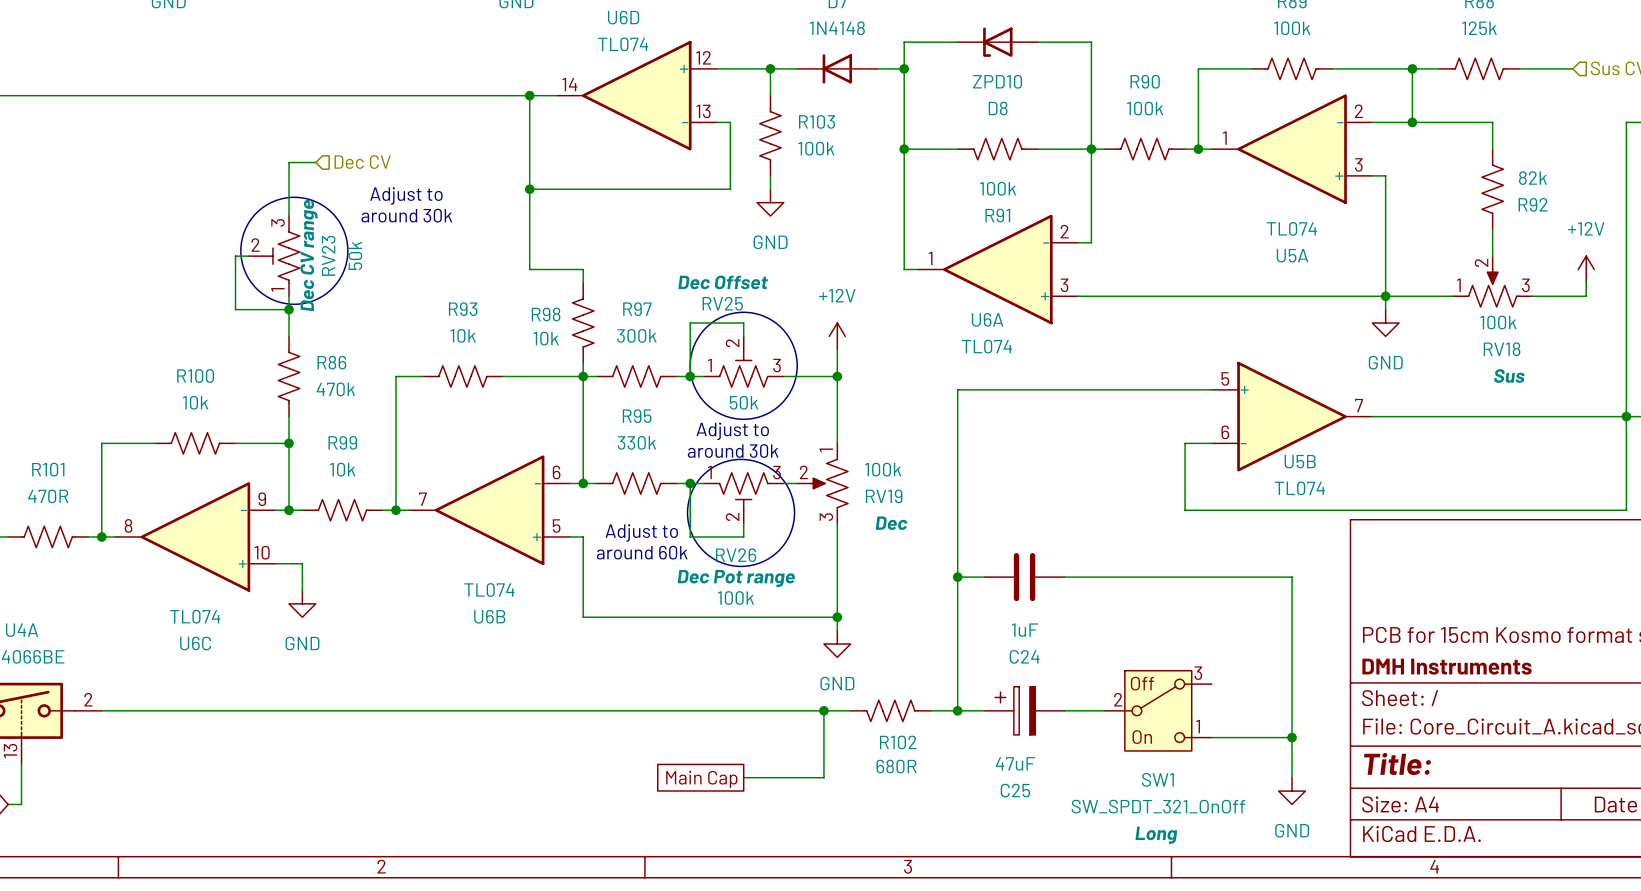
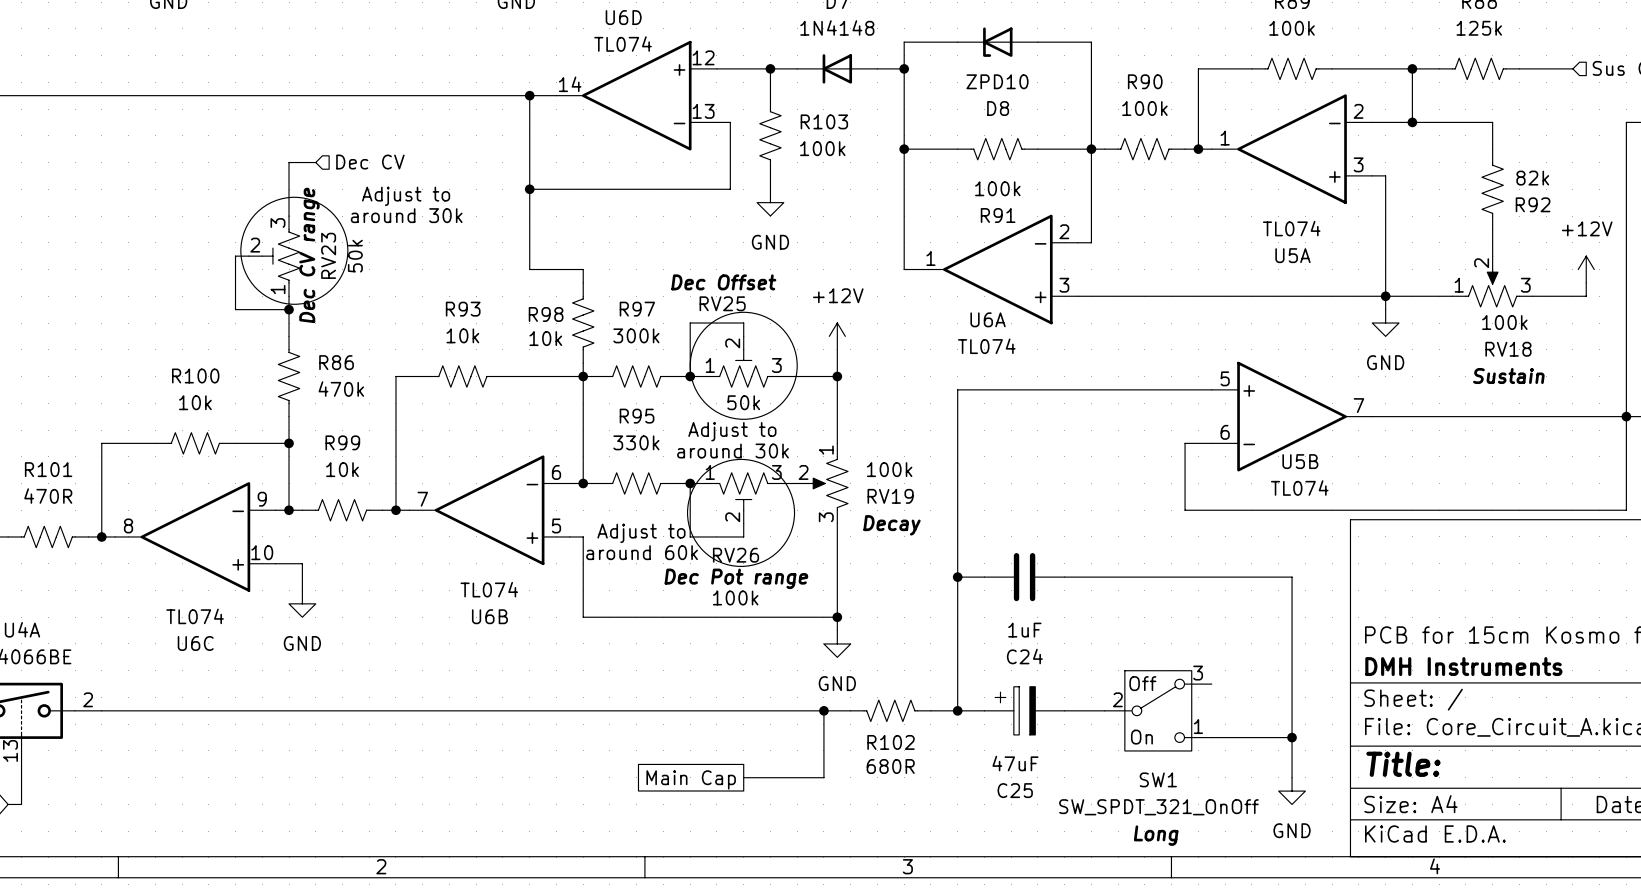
RV18 text: Sus (1509, 376) -> Sustain (1508, 376)
RV19 text: Dec (891, 523) -> Decay (892, 525)

